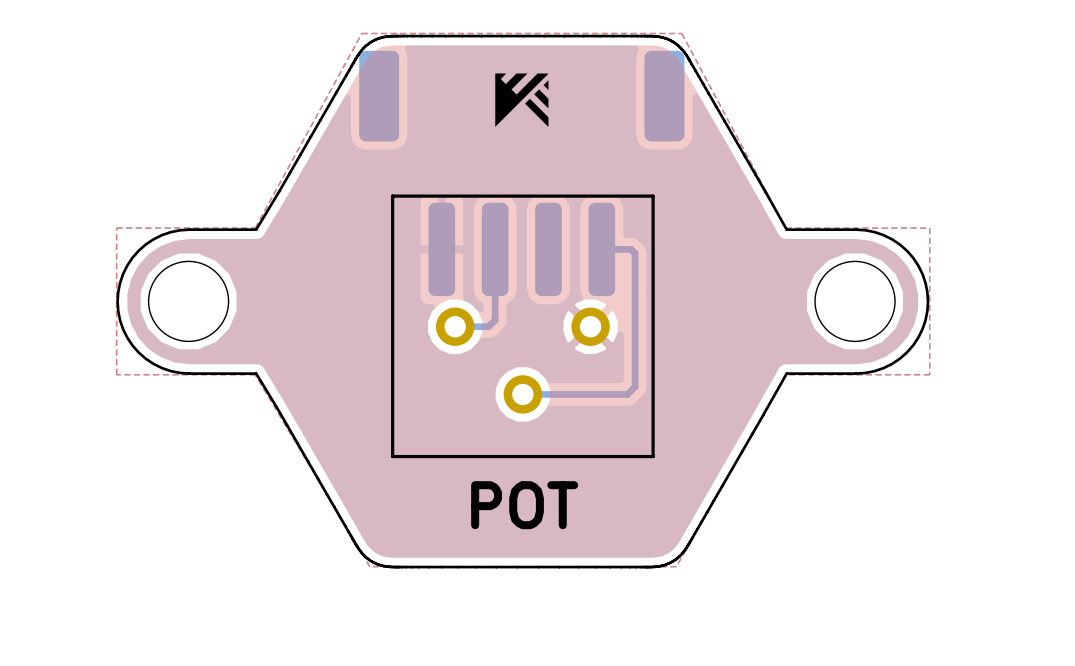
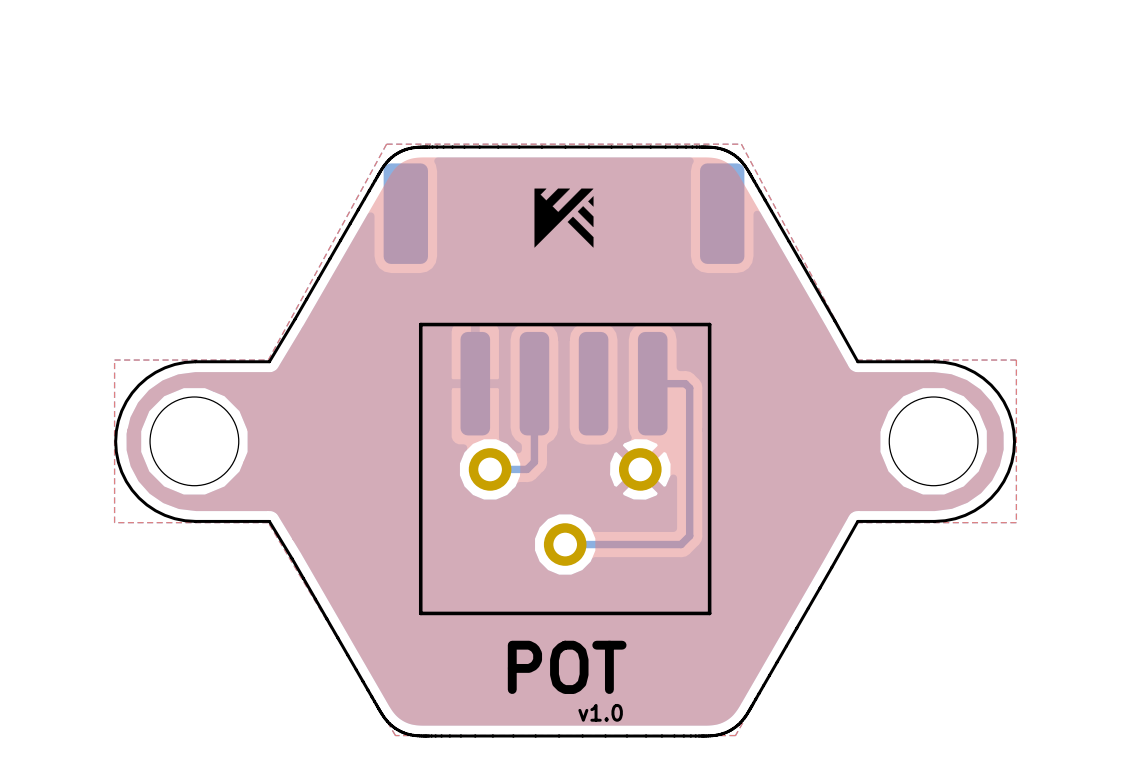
text: none -> v1.0 (600, 712)

